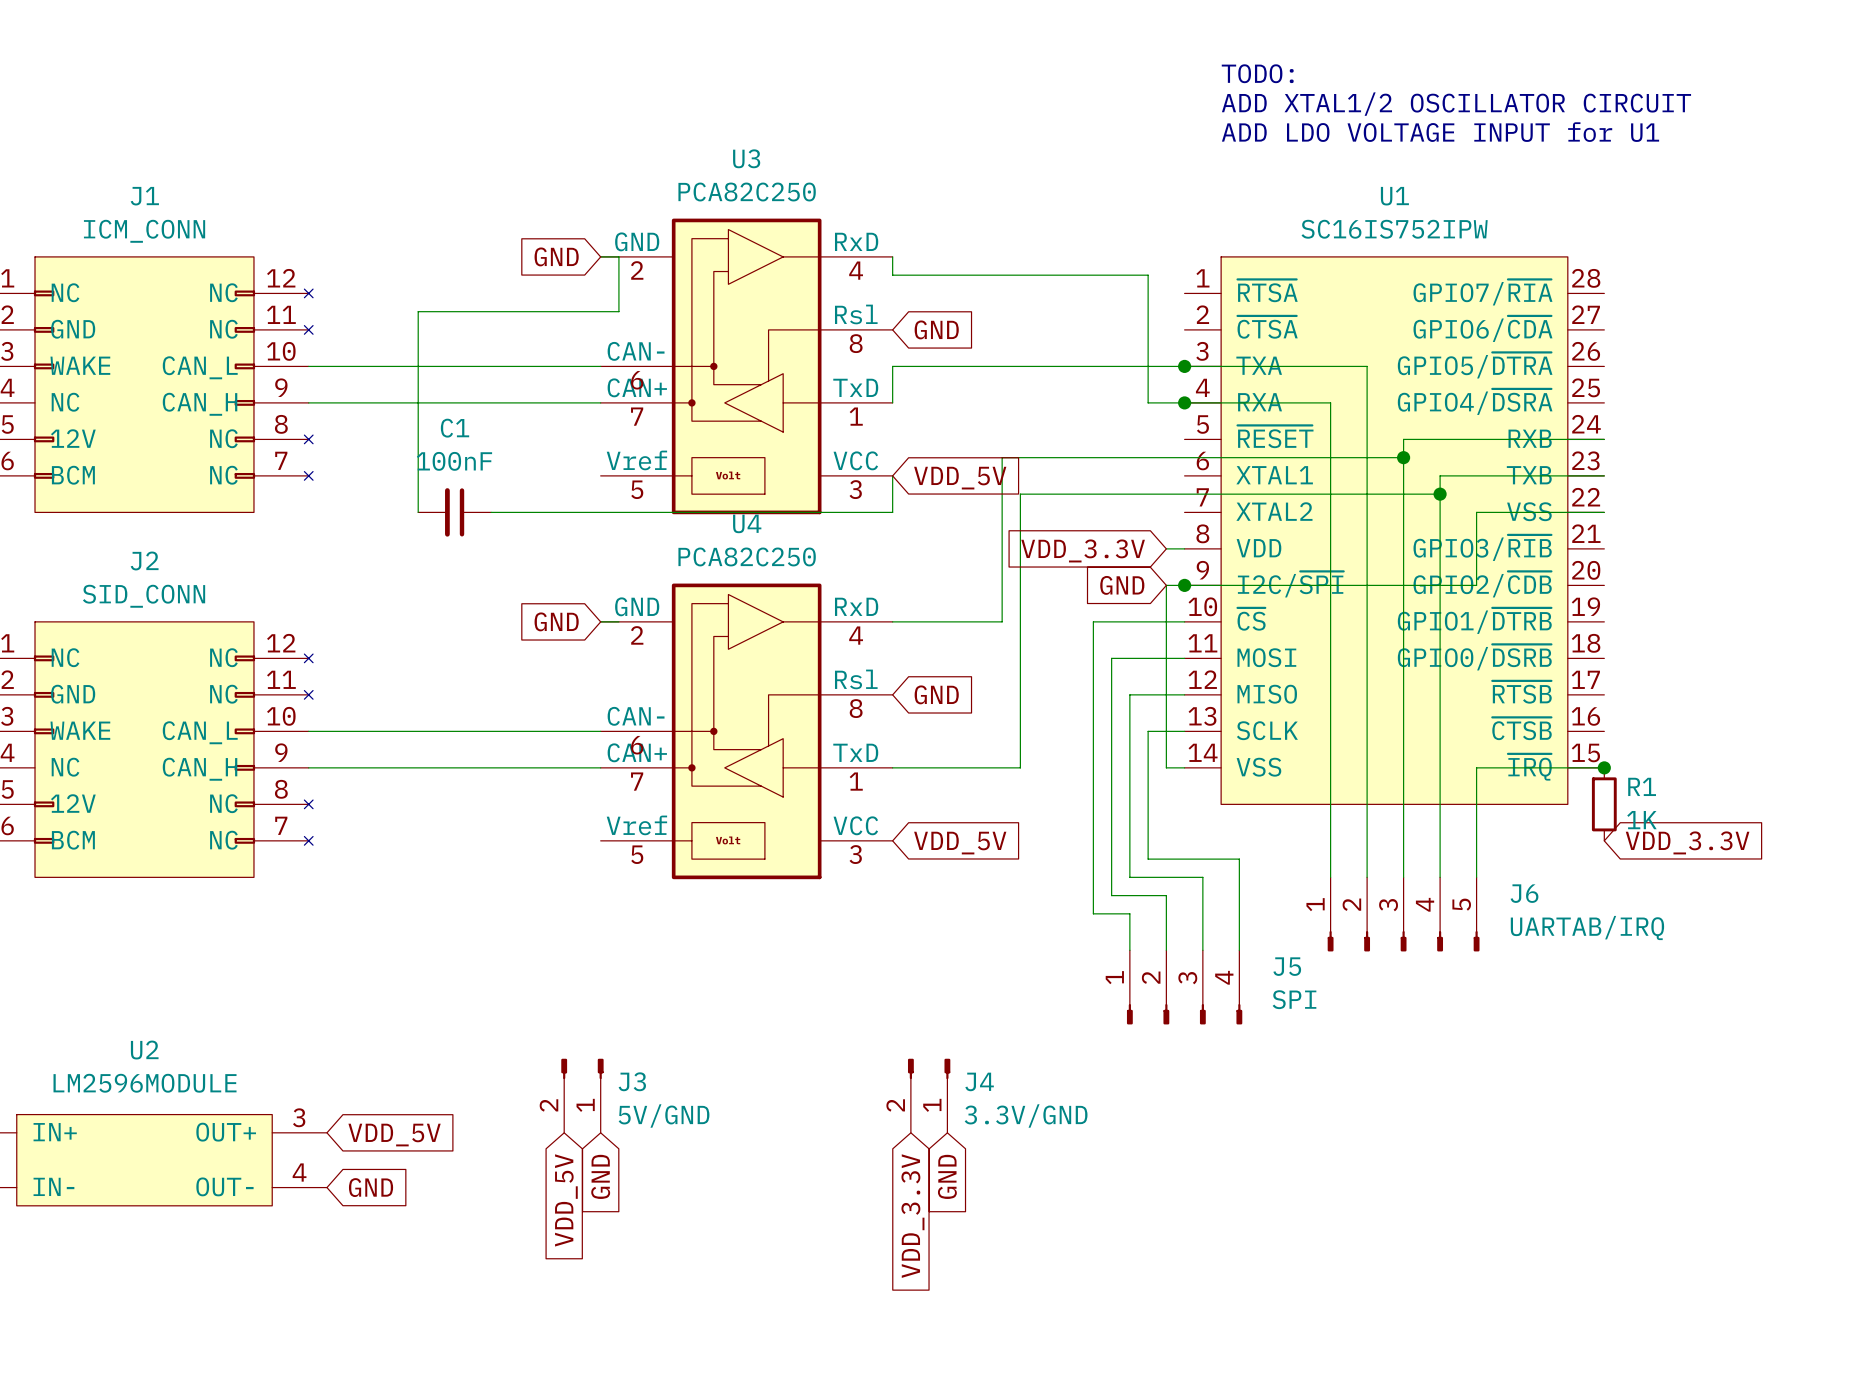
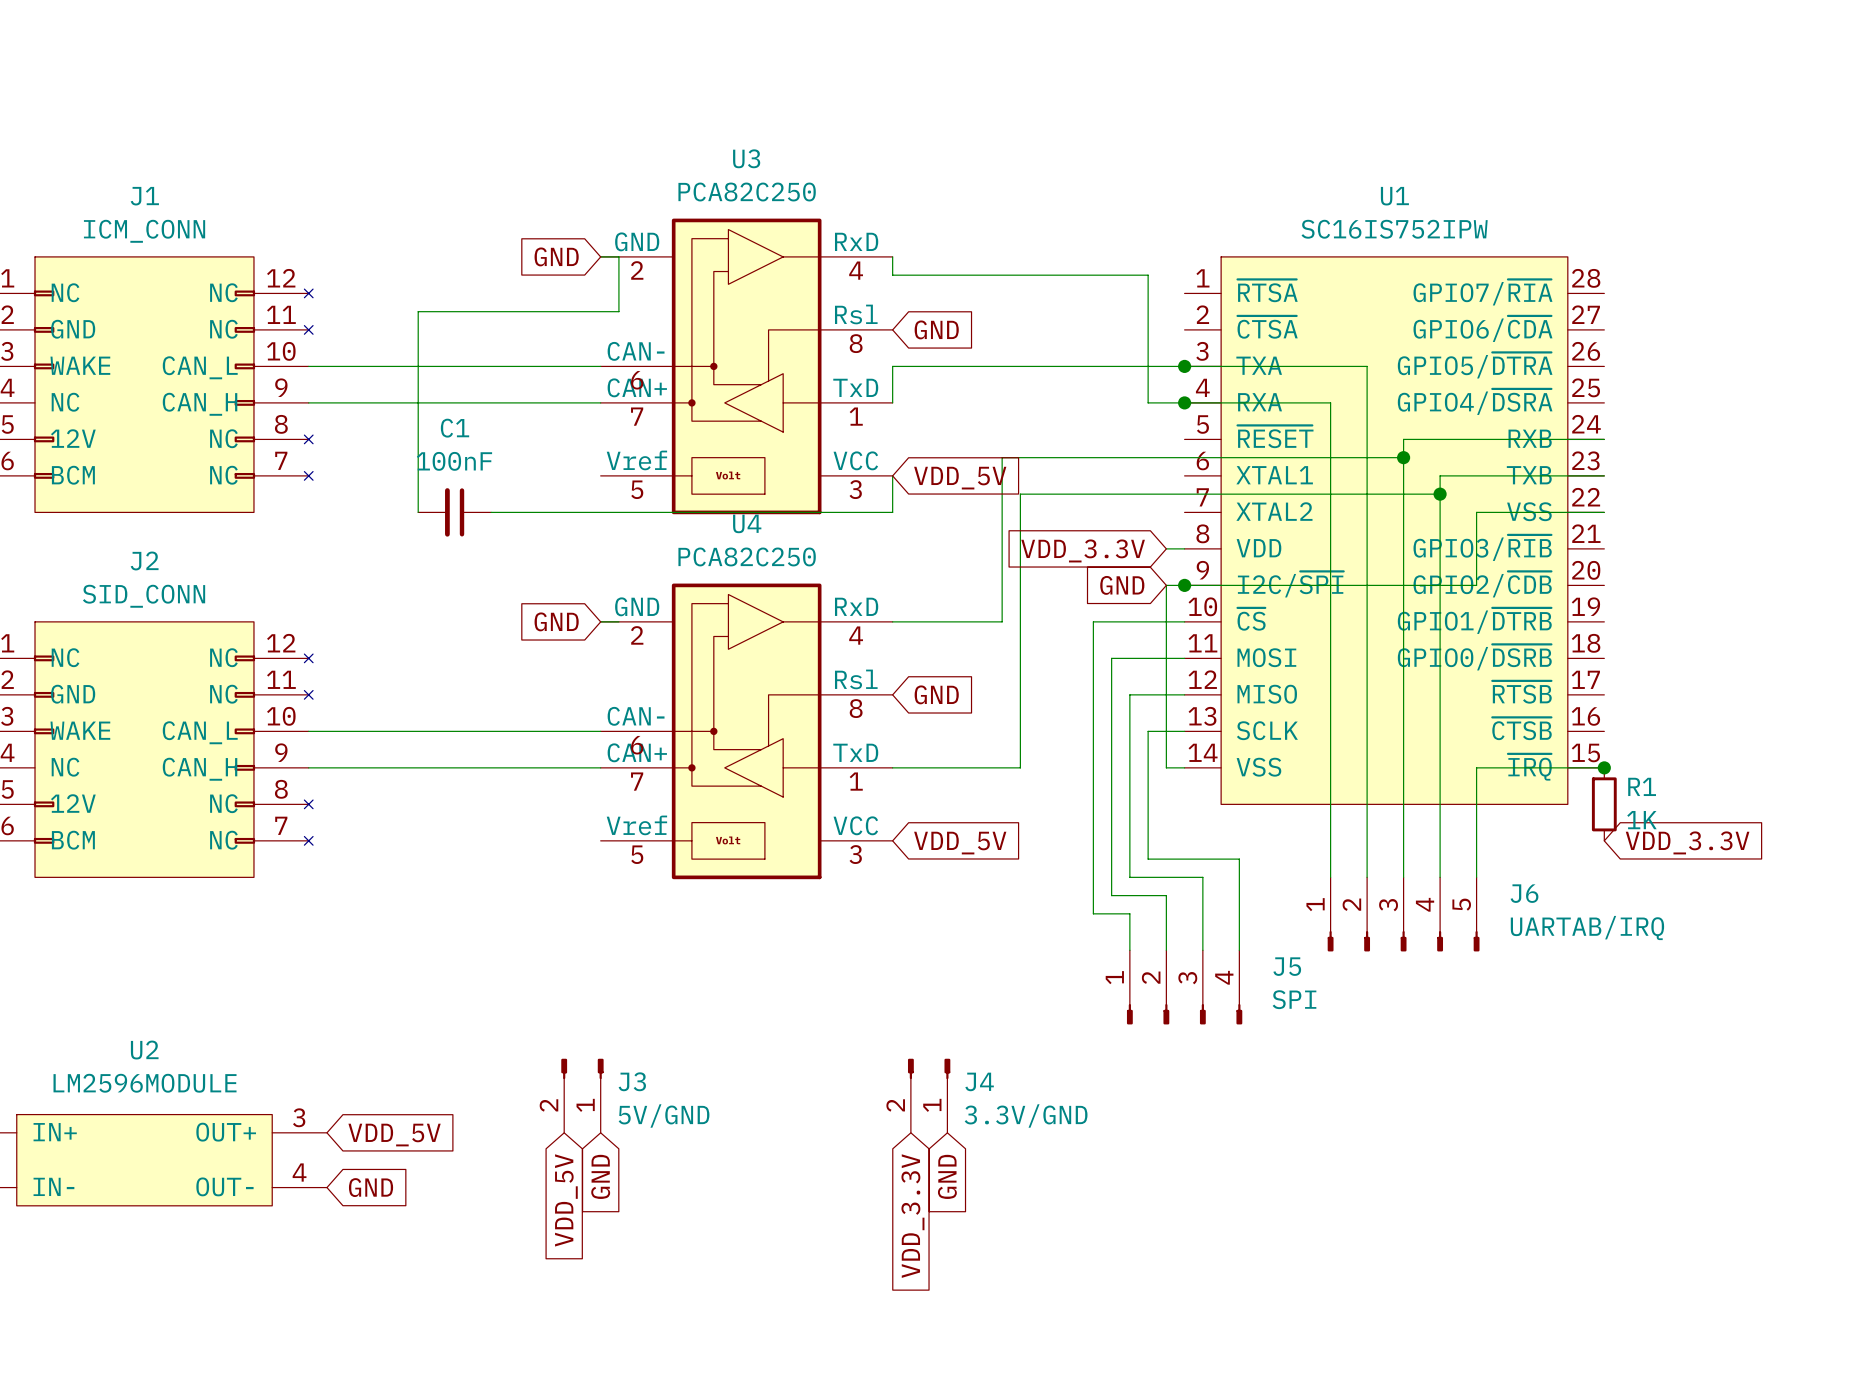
text: TODO: (1257, 73) -> none
text: ADD XTAL1/2 OSCILLATOR CIRCUIT (1456, 104) -> none
text: ADD LDO VOLTAGE INPUT for U1 (1440, 132) -> none

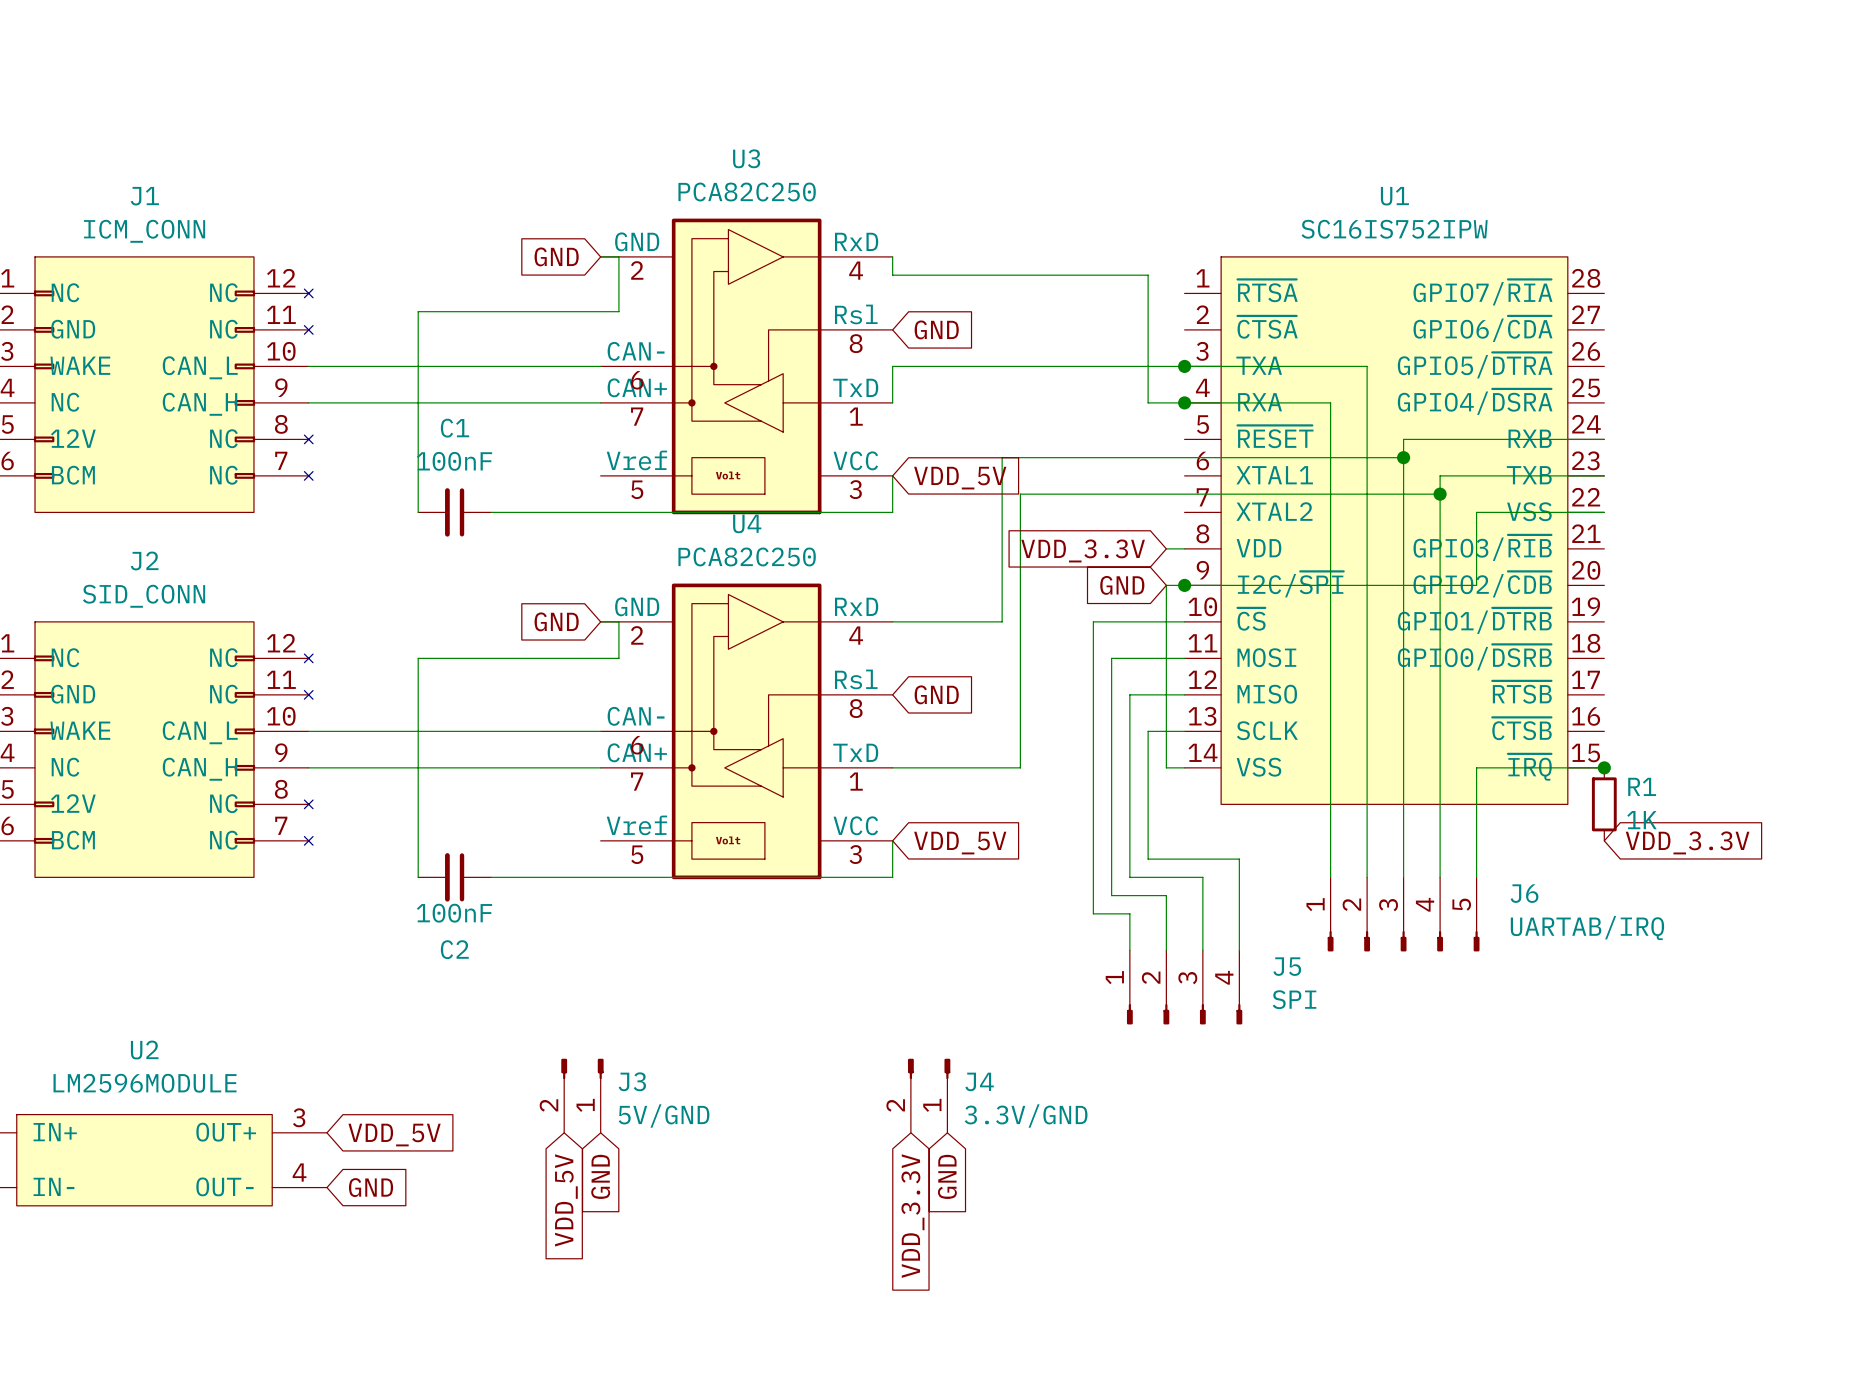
wire: none -> (618, 621) (618, 658) (418, 658) (418, 877)
wire: none -> (892, 840) (892, 877) (491, 877)
C2: none -> 100nF (454, 877)

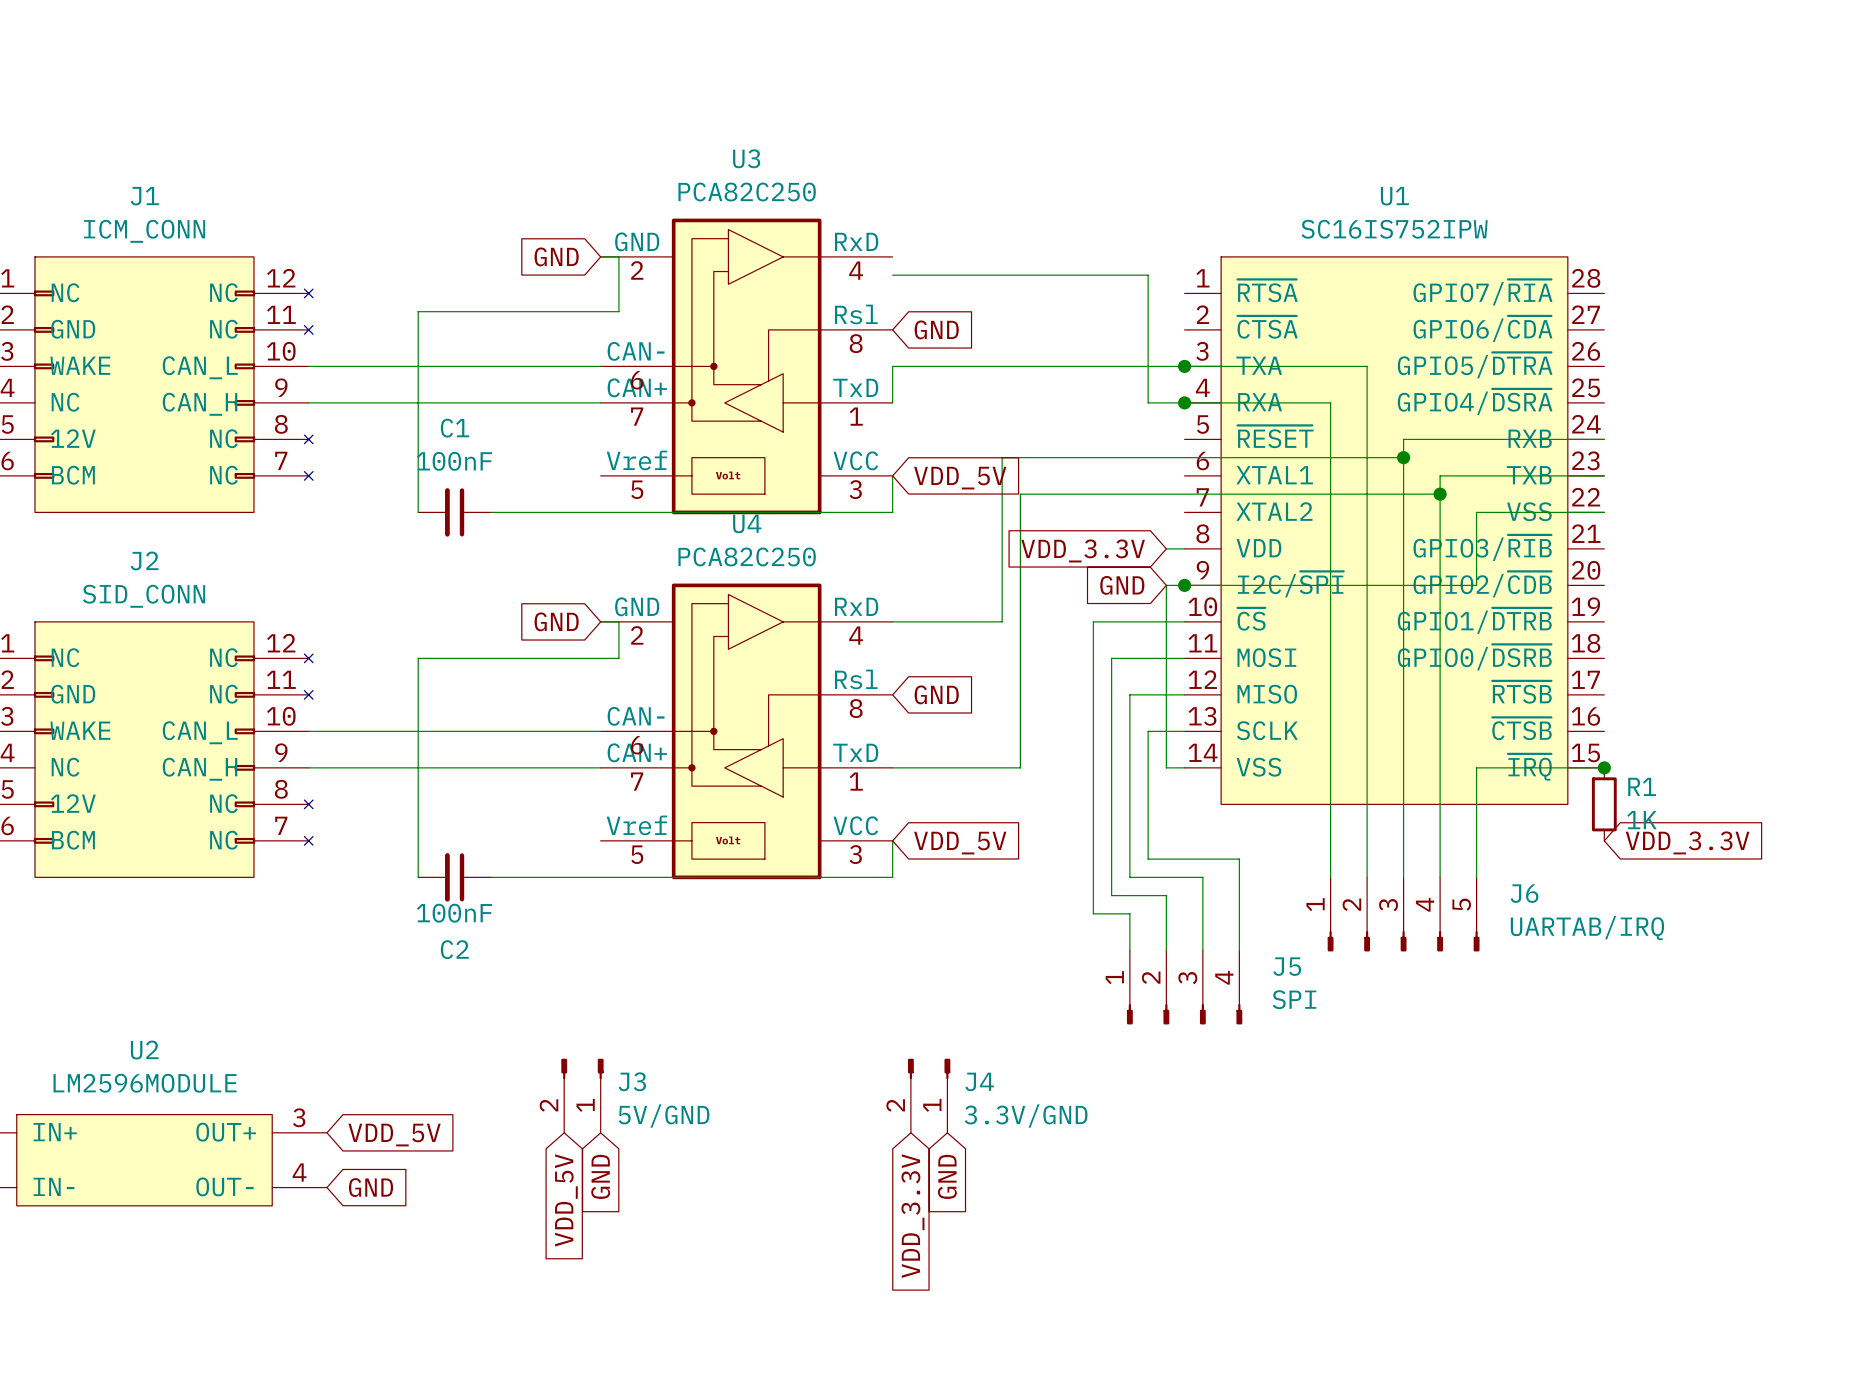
wire: (892, 256) (892, 275) -> none

